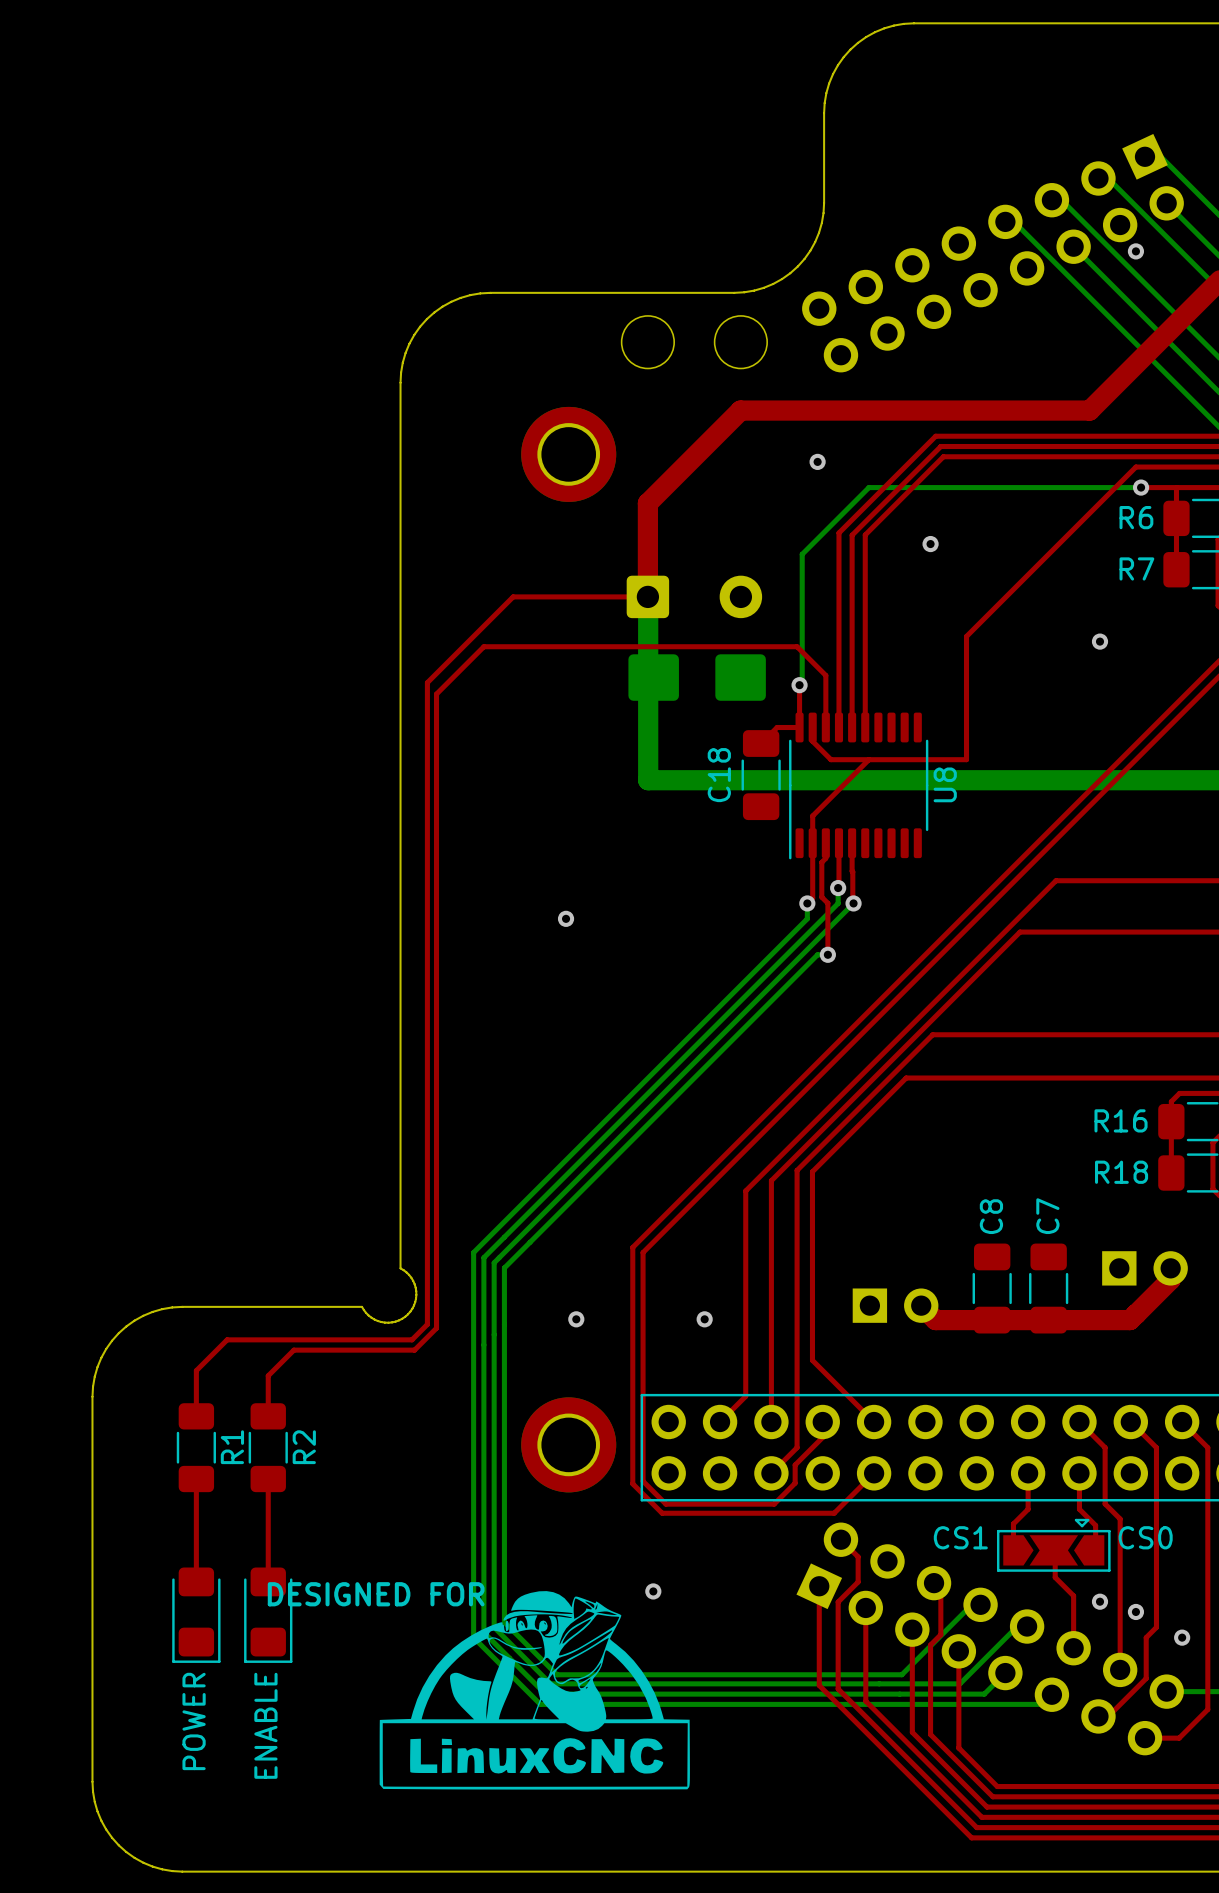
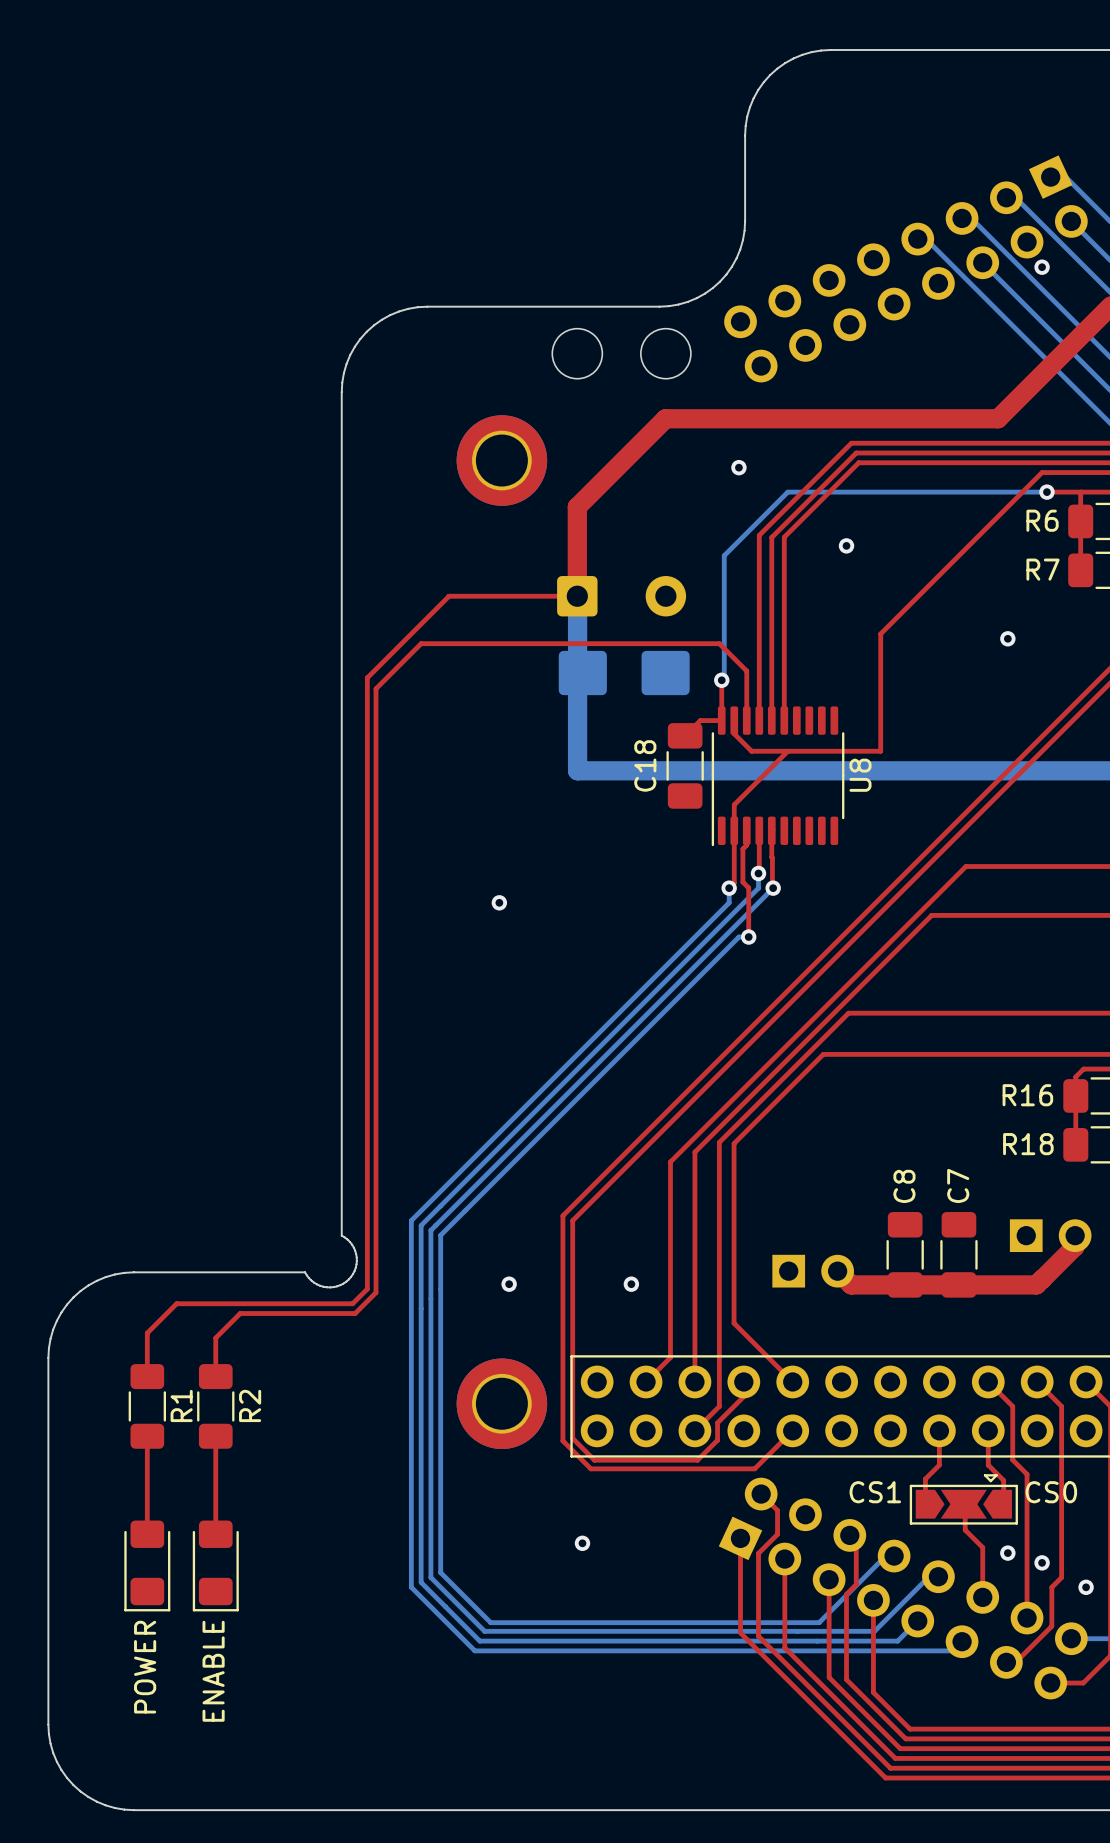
drawing: [379, 1591, 690, 1790] -> none
text: DESIGNED FOR (376, 1594) -> none

